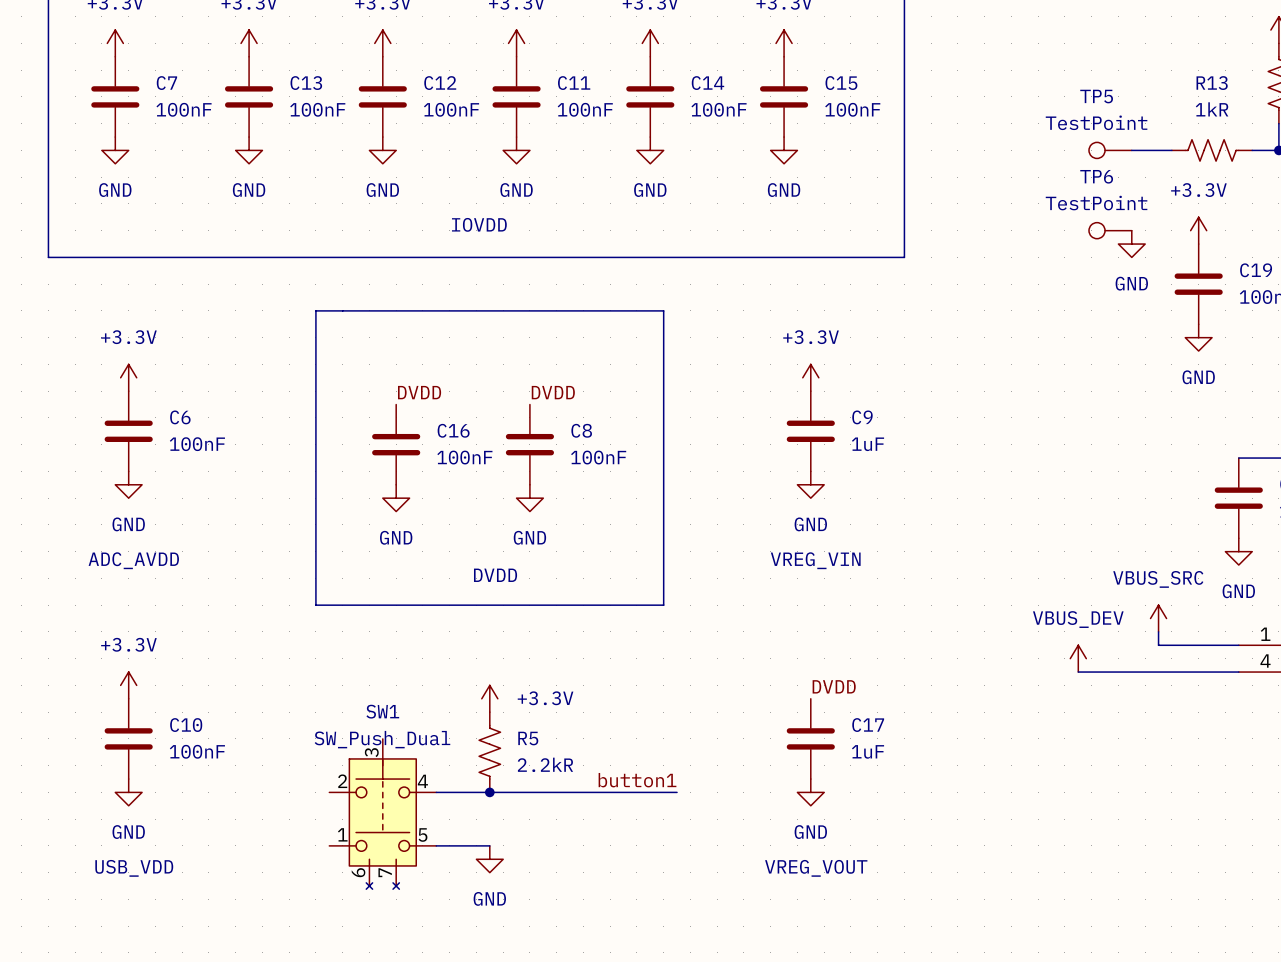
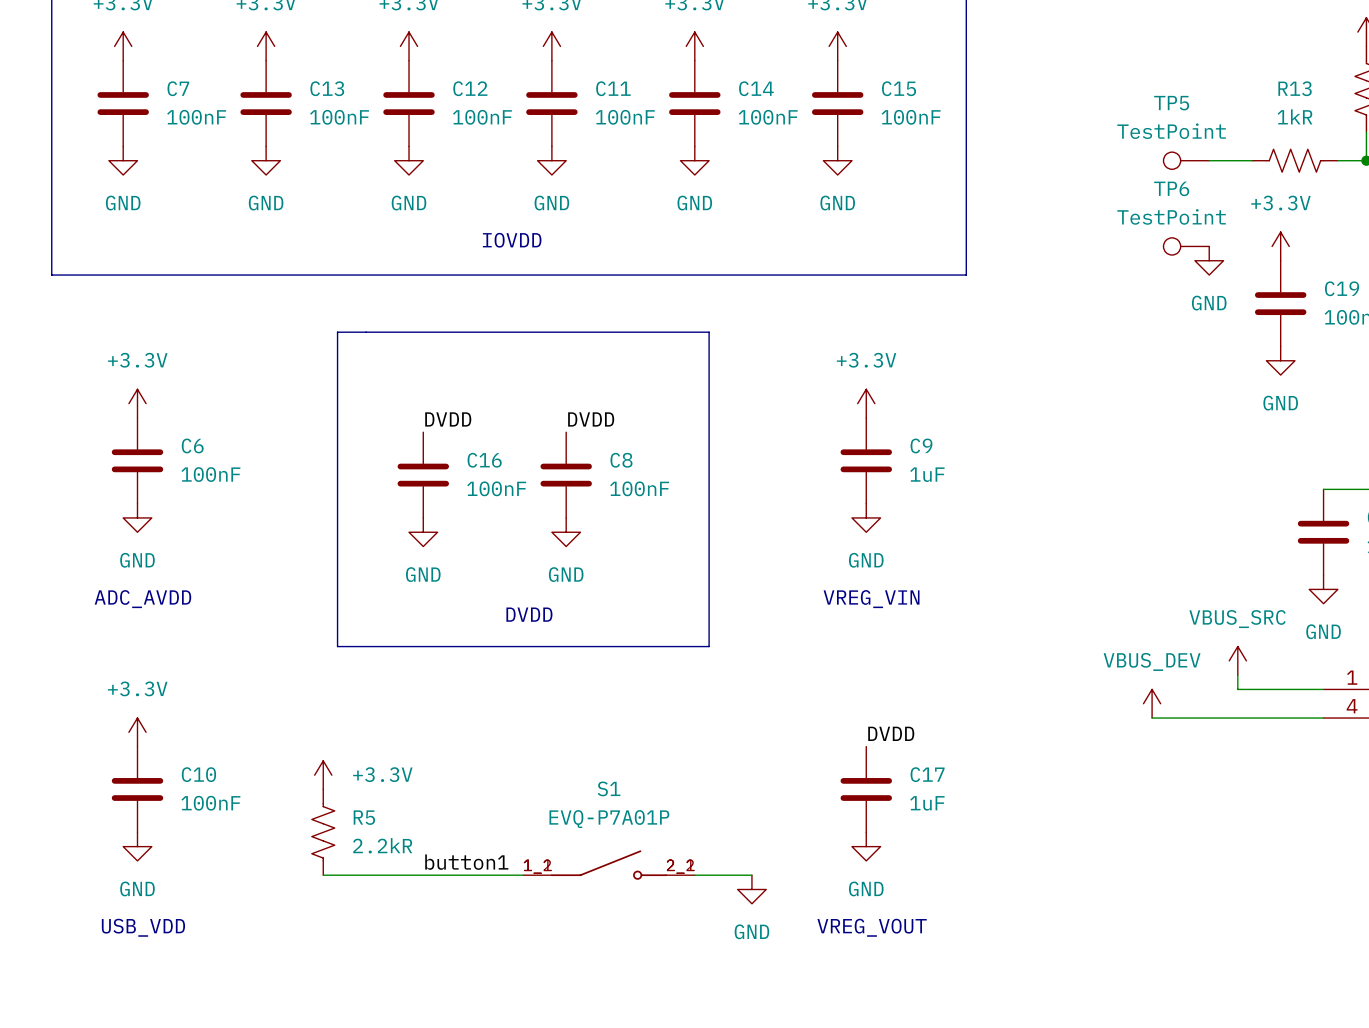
power symbol position: +3.3V (489, 698) -> +3.3V (323, 775)
R5 position: (489, 752) -> (323, 832)
label position: button1 (637, 780) -> button1 (466, 862)
wire: (436, 792) (677, 792) -> none
junction: (489, 792) -> none
S1: none -> EVQ-P7A01P (609, 865)
SW1: SW_Push_Dual (382, 814) -> none
wire: none -> (323, 875) (523, 875)
wire: (436, 845) (489, 845) -> (694, 875) (751, 875)
power symbol position: GND (489, 859) -> GND (751, 889)

